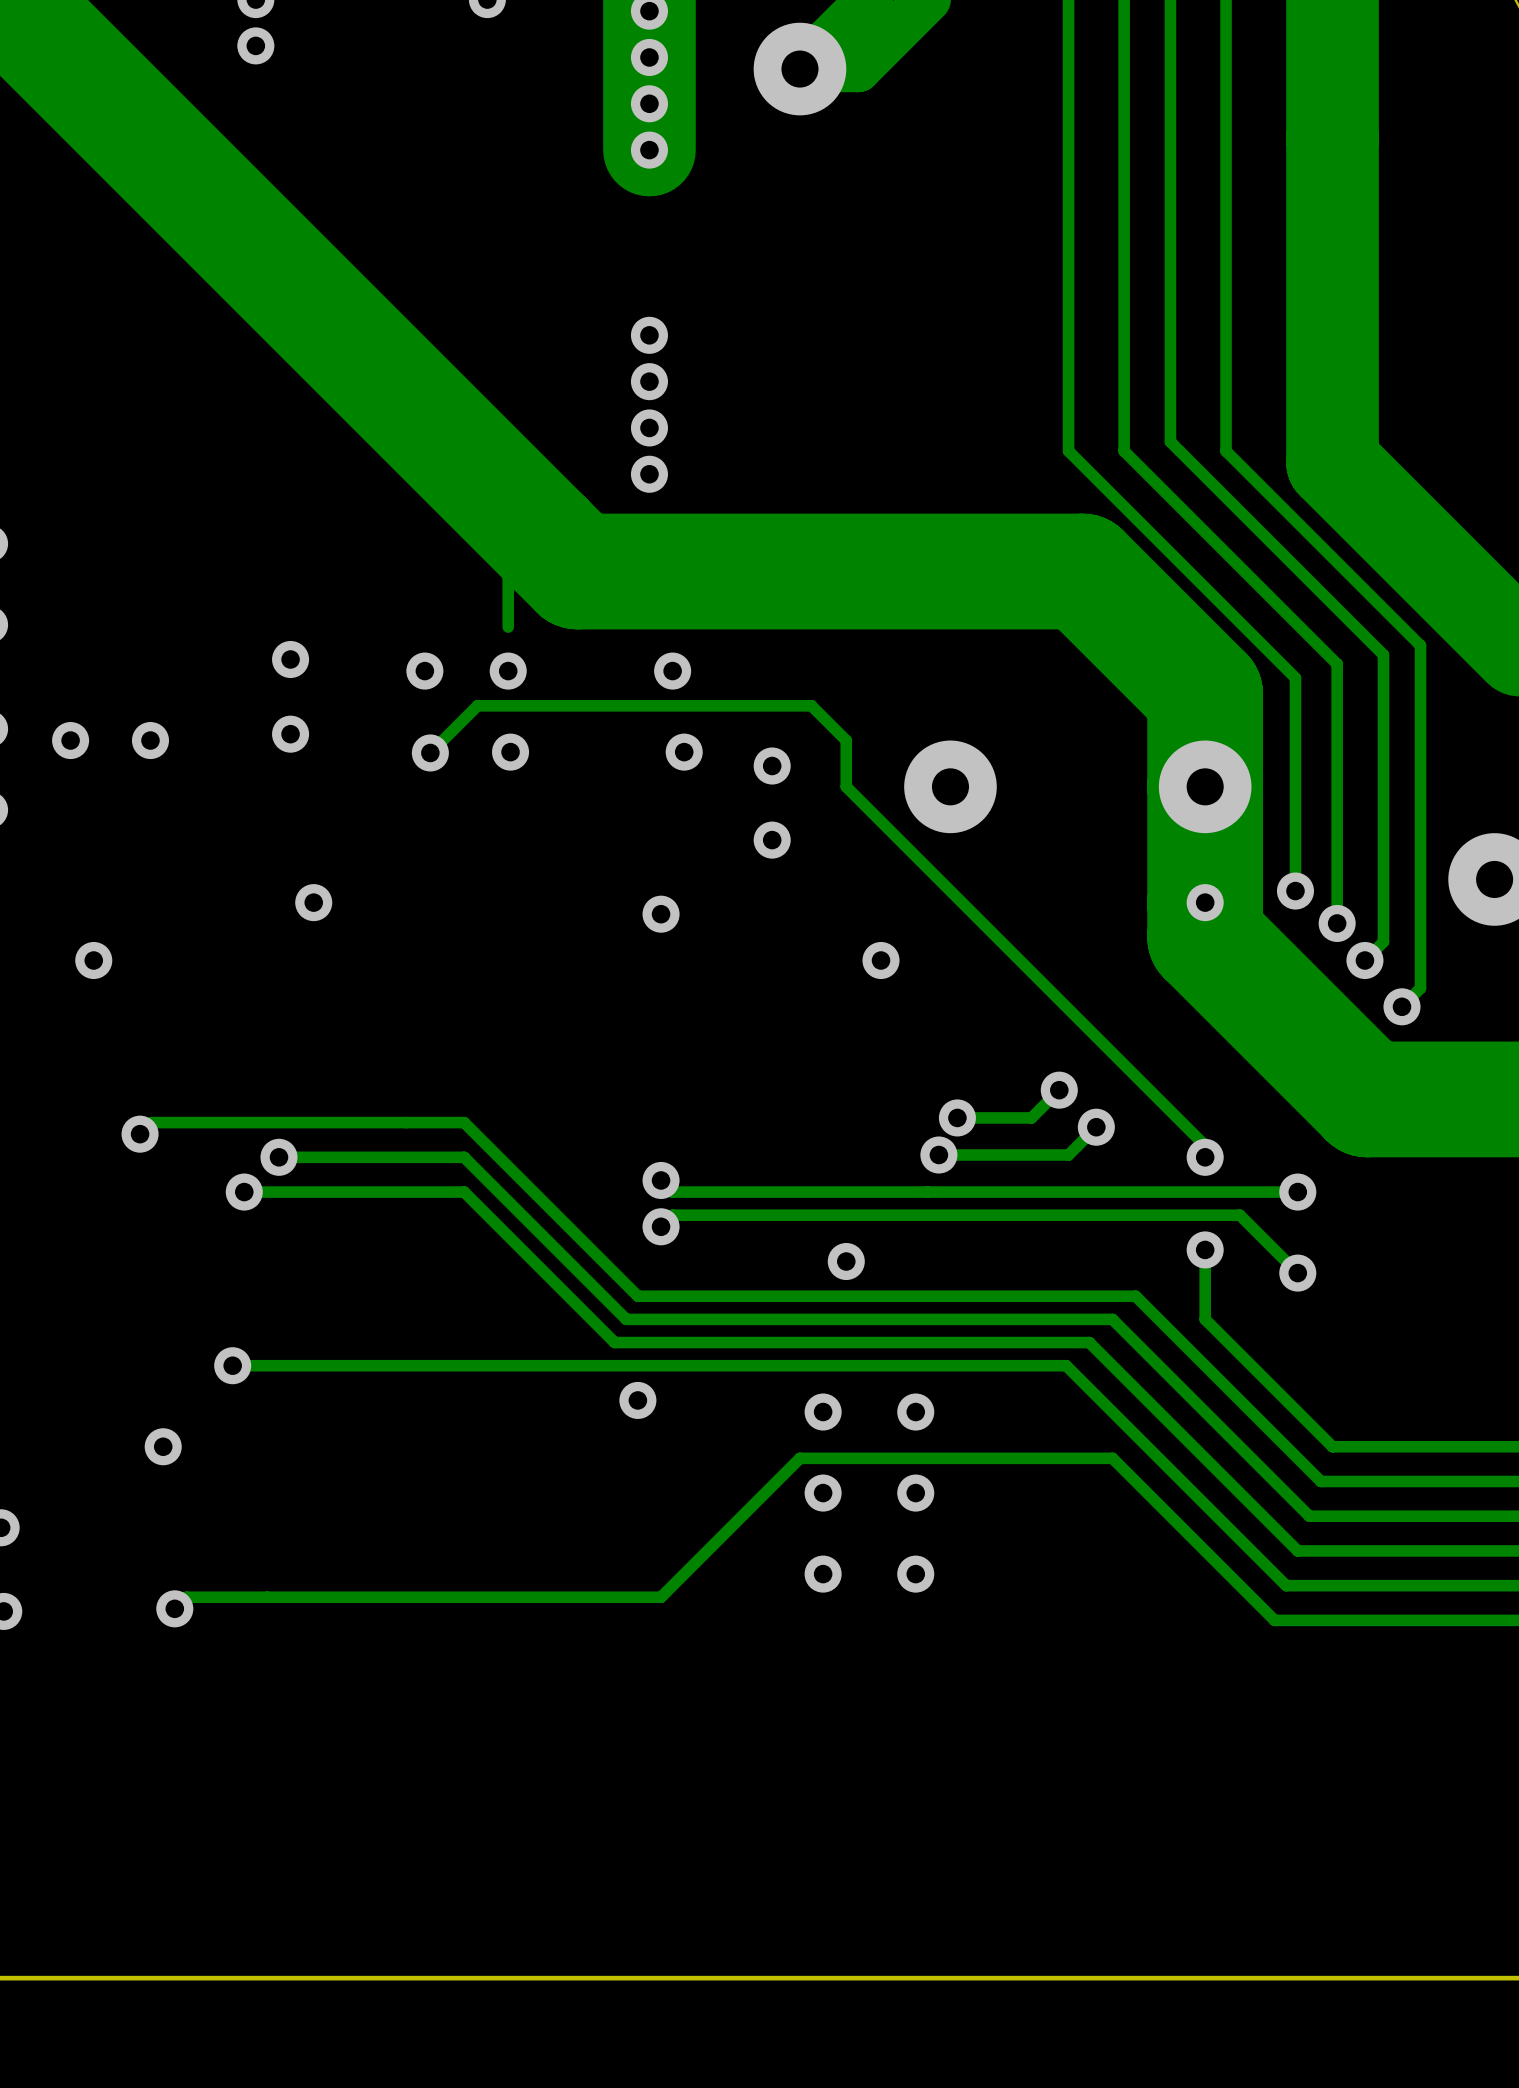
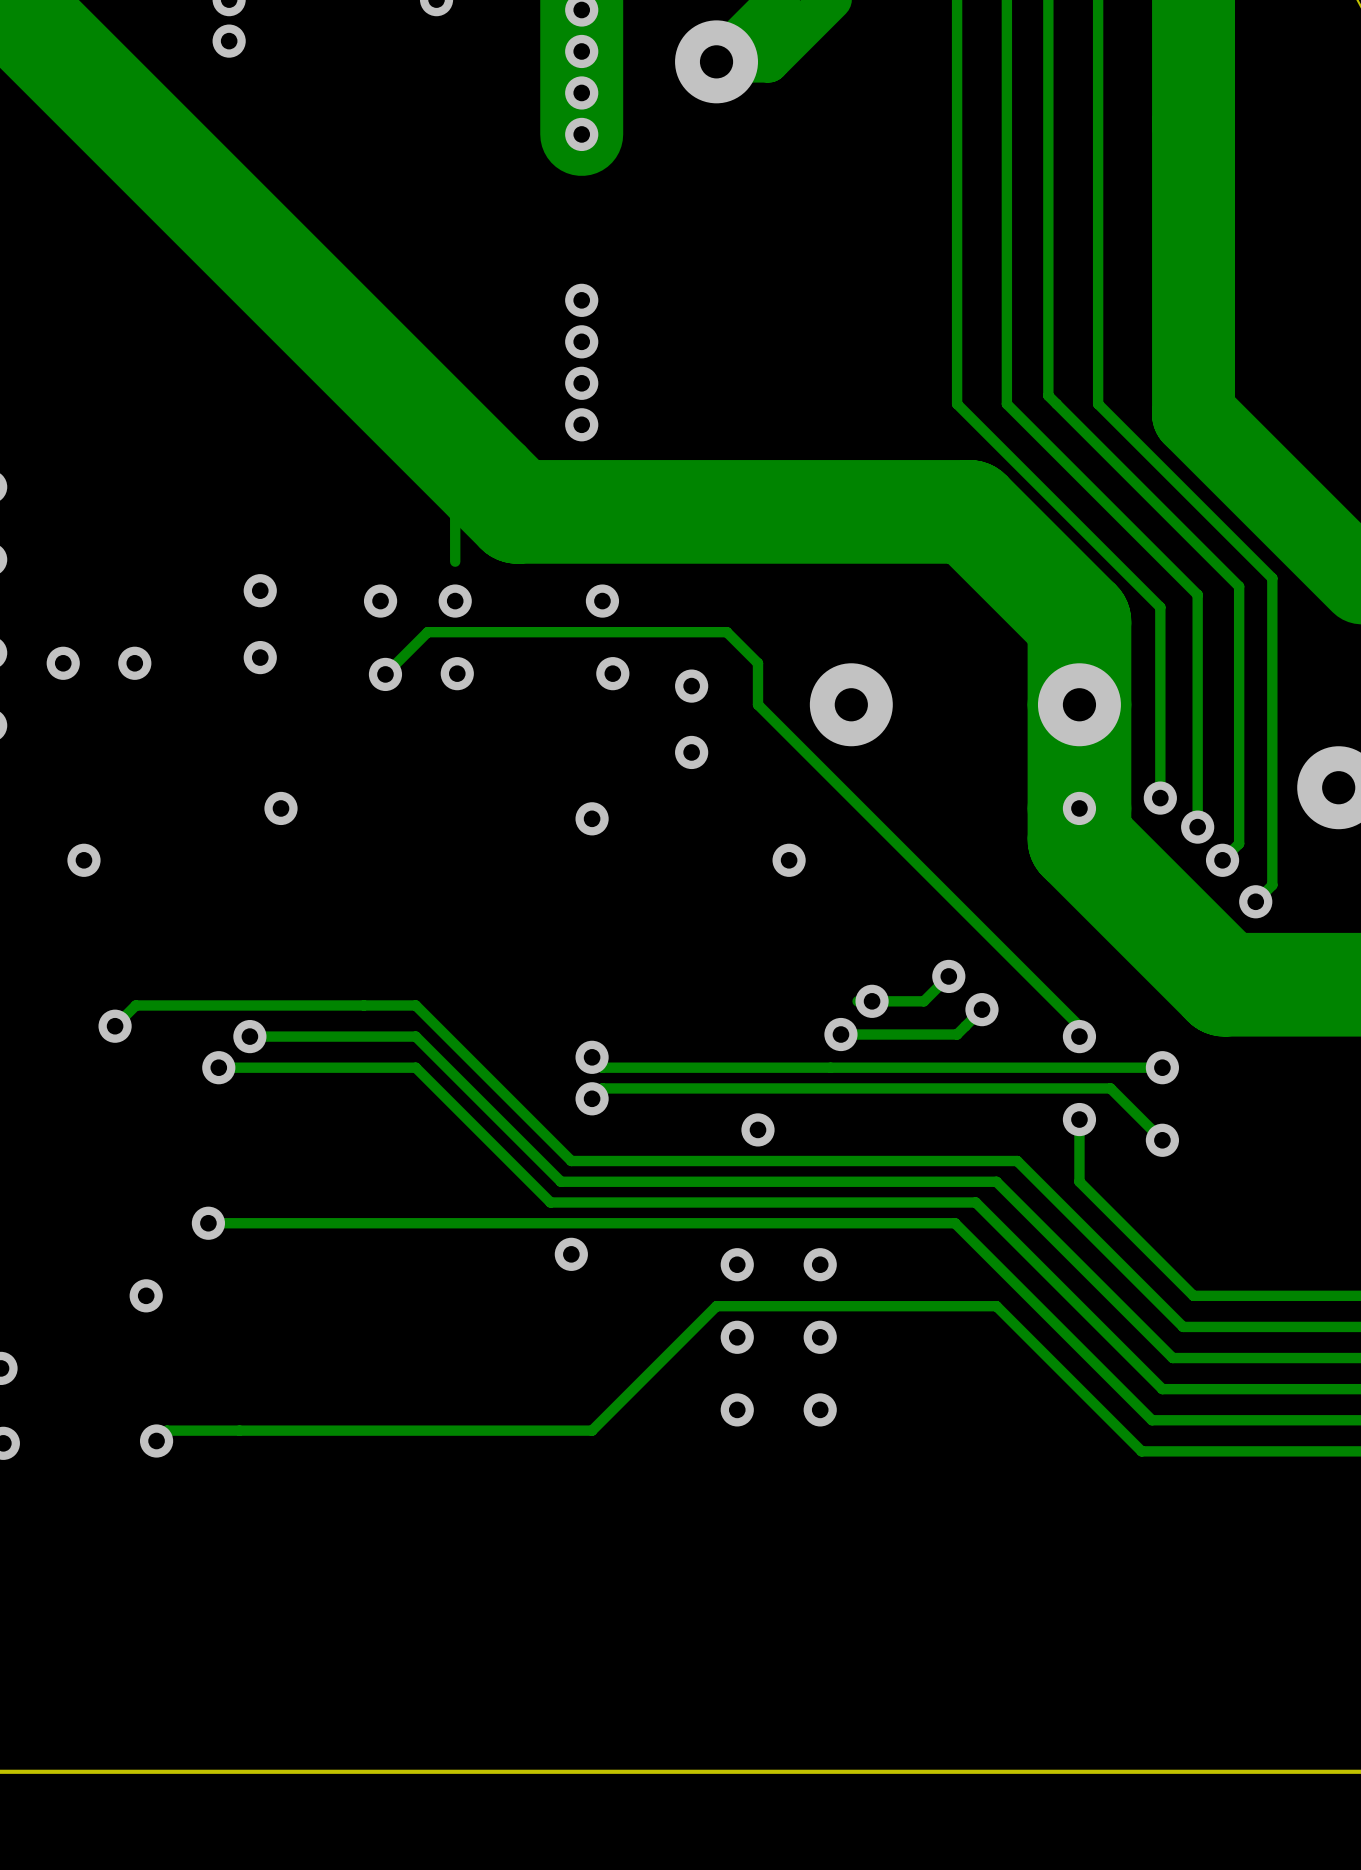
via position: (957, 1117) -> (872, 1001)
via position: (140, 1134) -> (115, 1026)

